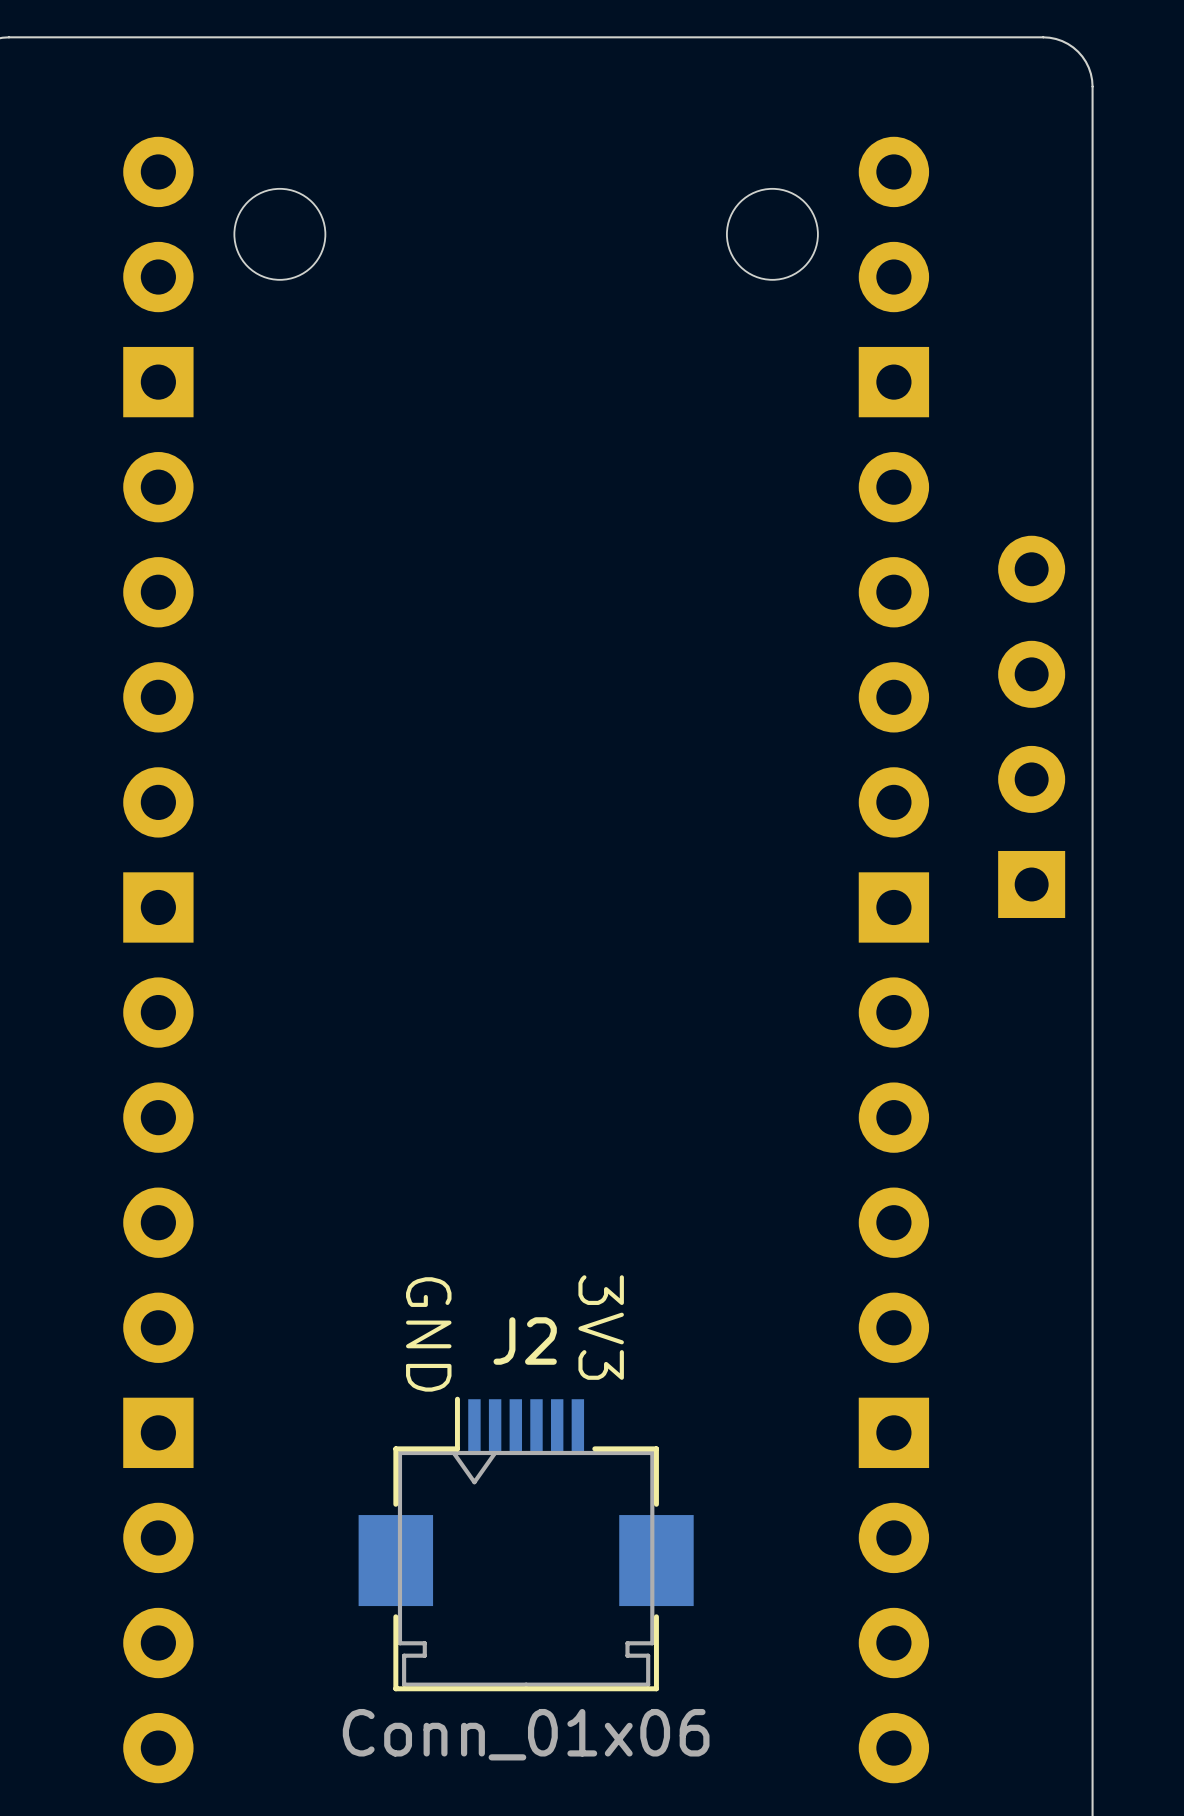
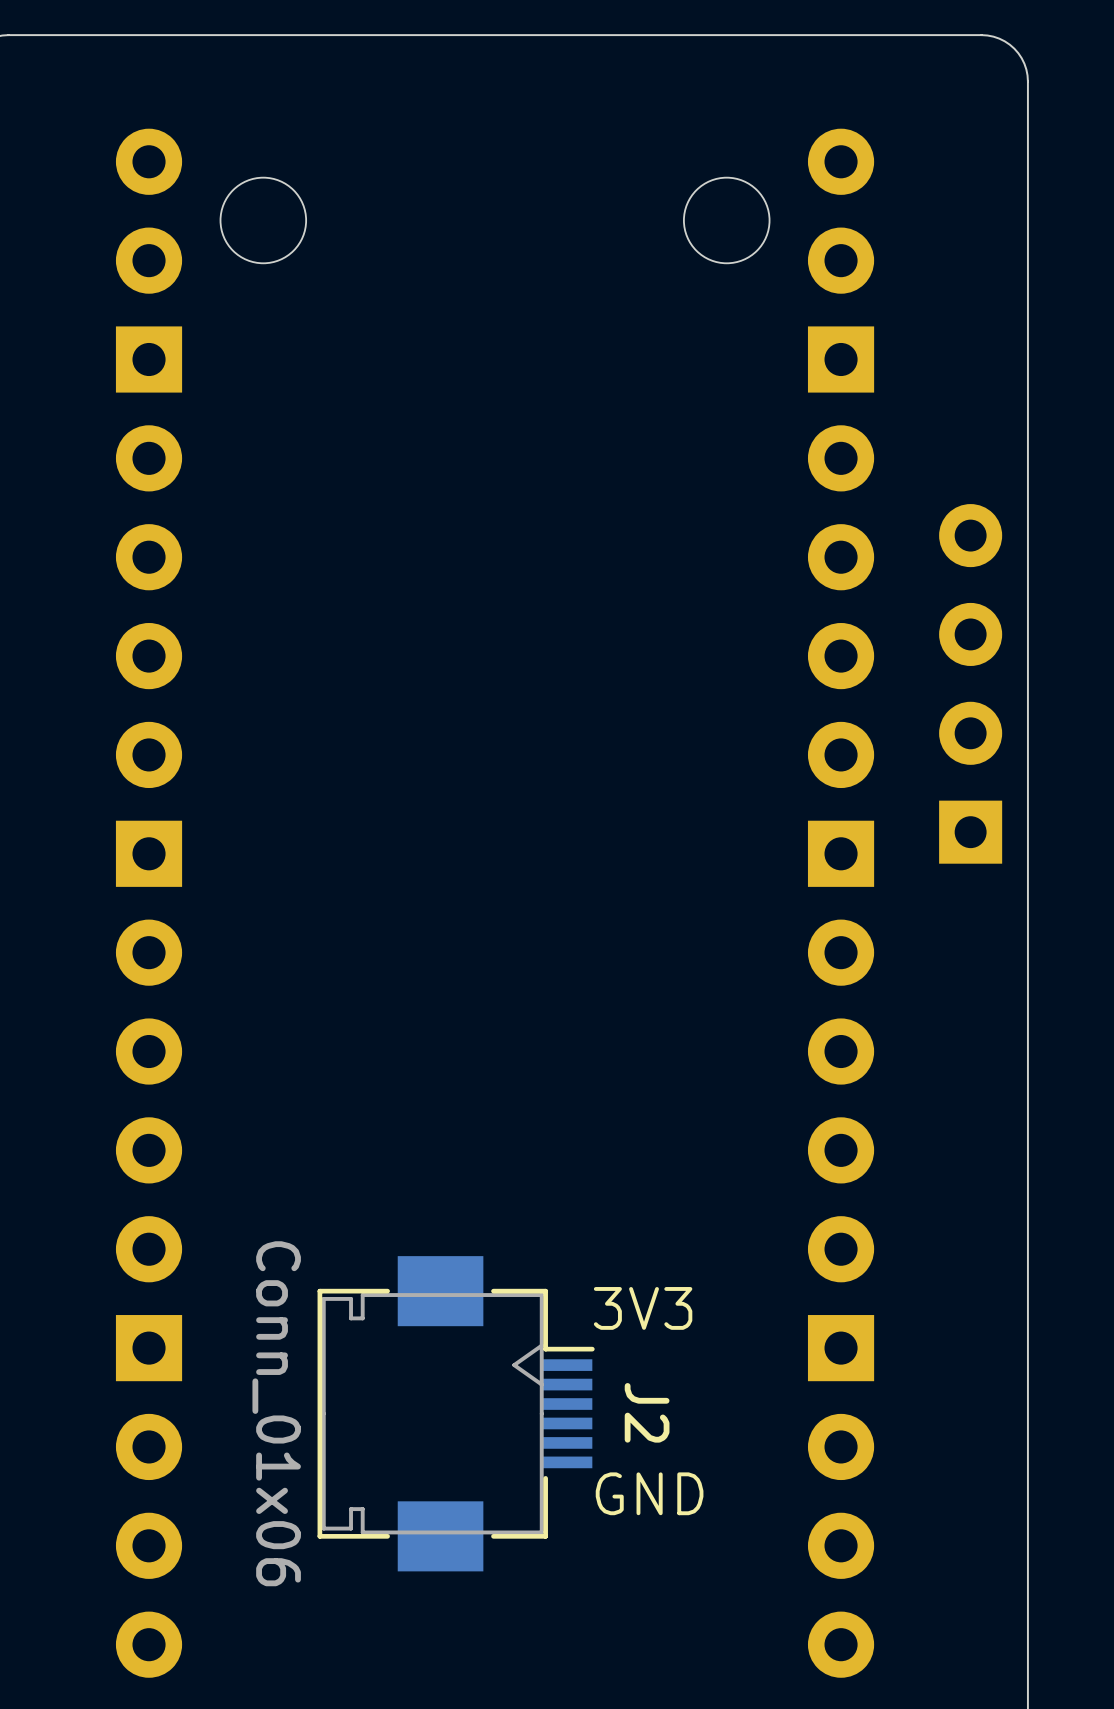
text rotation: 0° (601, 1327) -> 90° counterclockwise (643, 1308)
text rotation: 0° (428, 1334) -> 90° counterclockwise (649, 1493)
text position: GND (428, 1334) -> GND (649, 1493)
J2 rotation: 0° (526, 1544) -> 90° clockwise (456, 1413)

